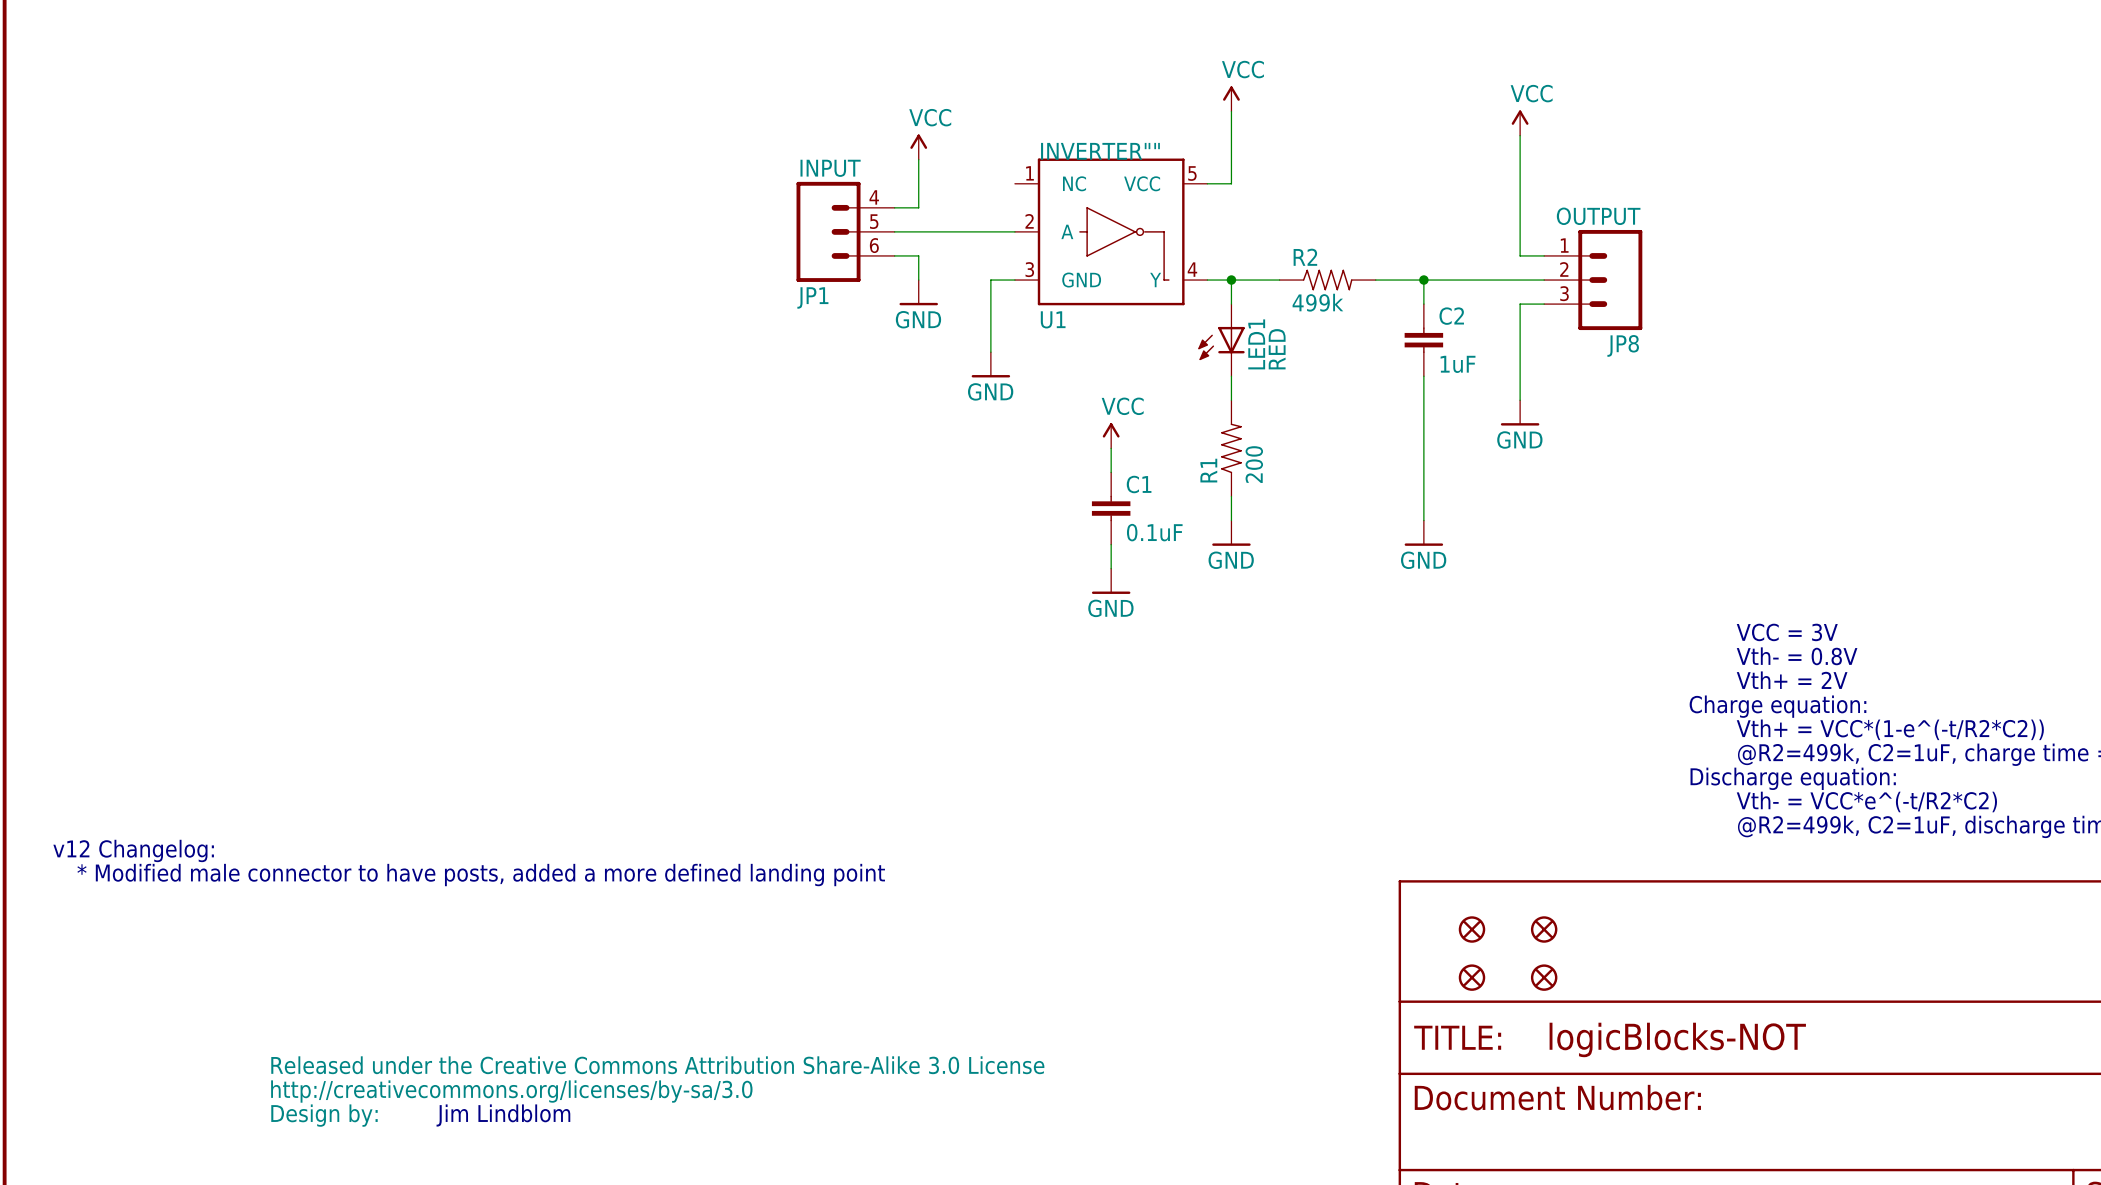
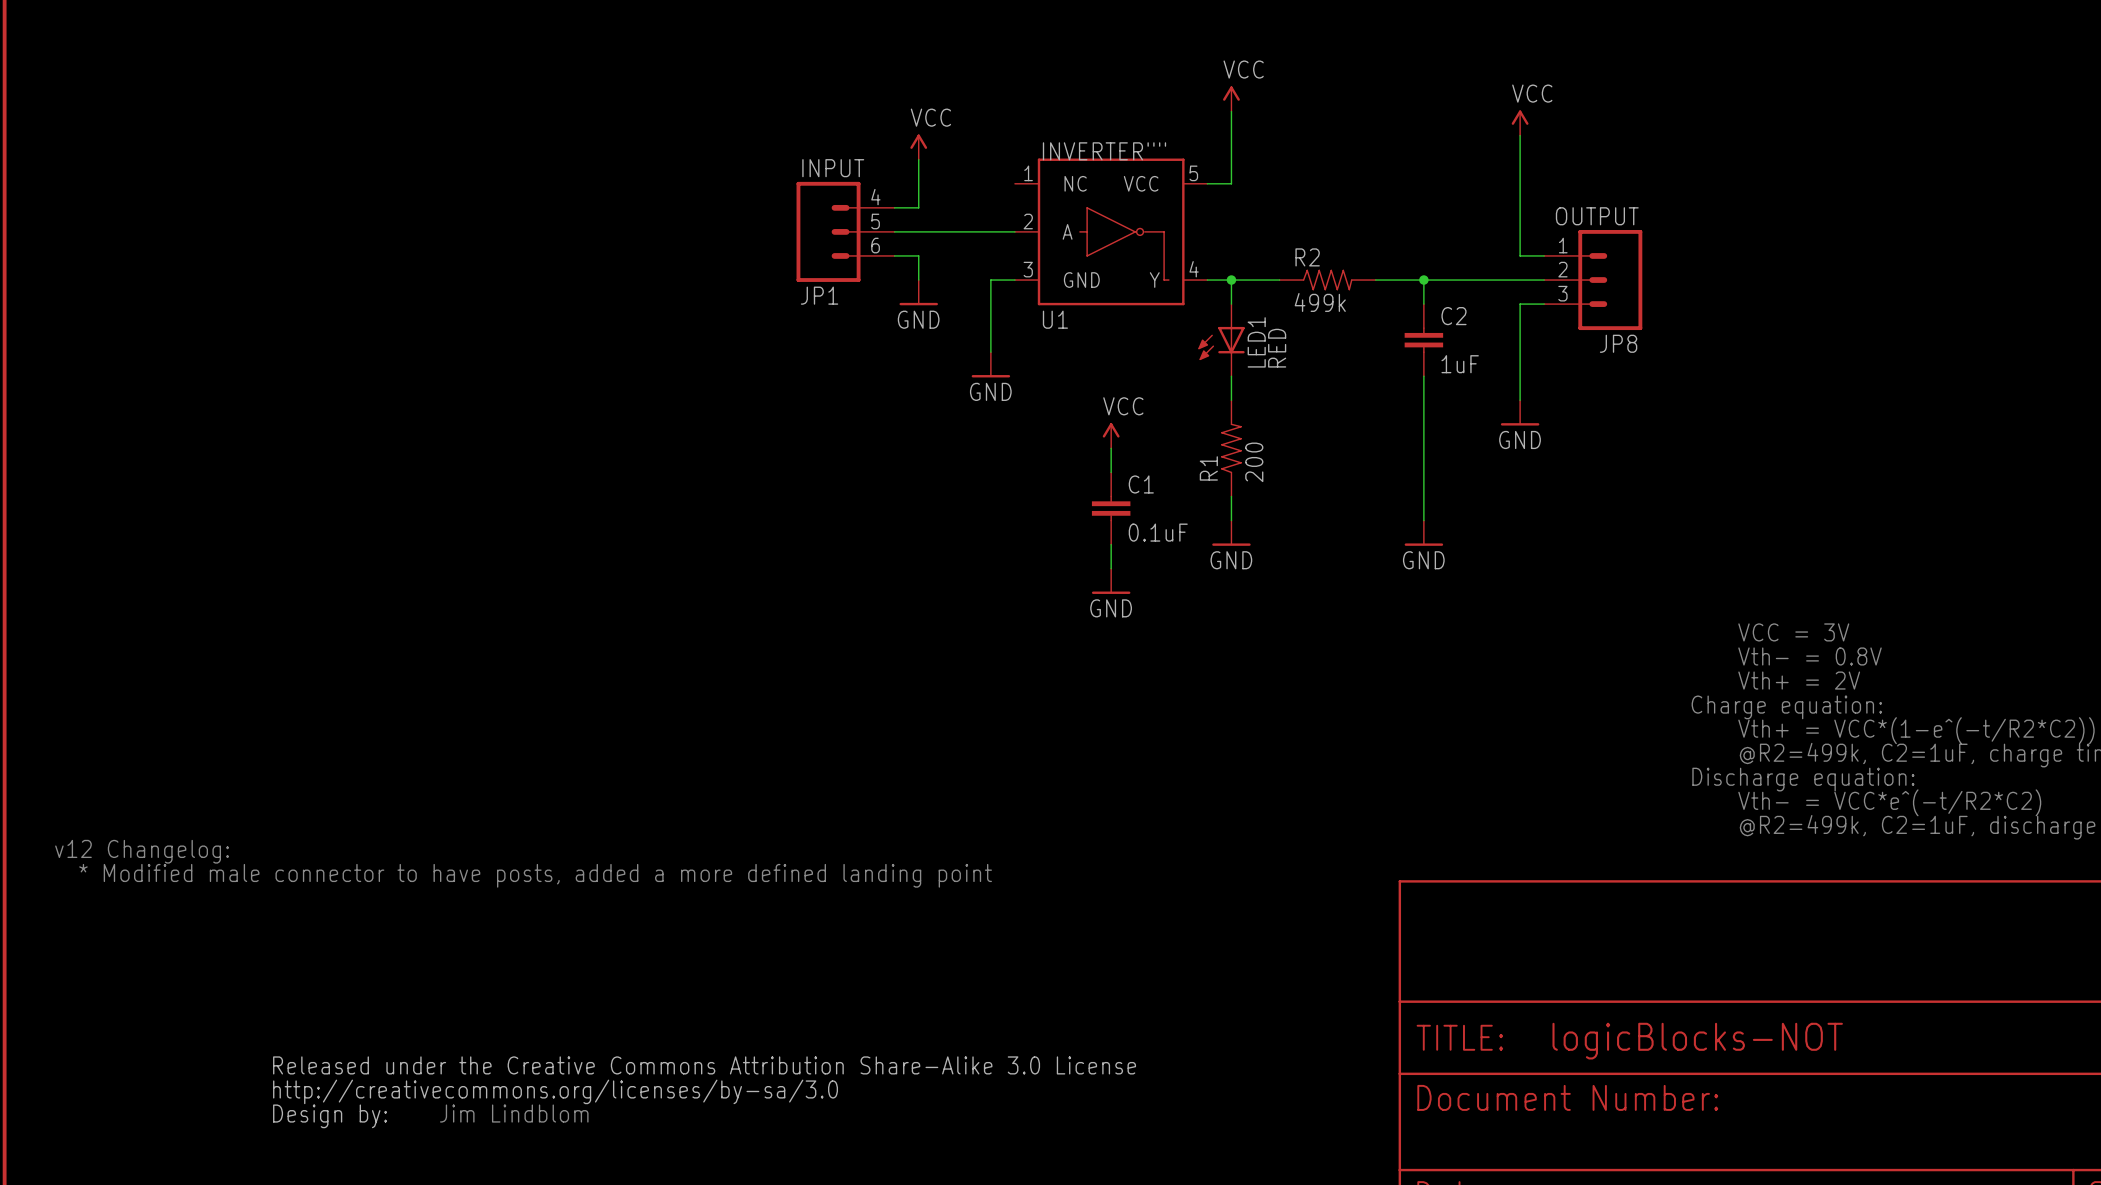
part: (1471, 929) -> none
part: (1544, 929) -> none
part: (1471, 977) -> none
part: (1544, 977) -> none

